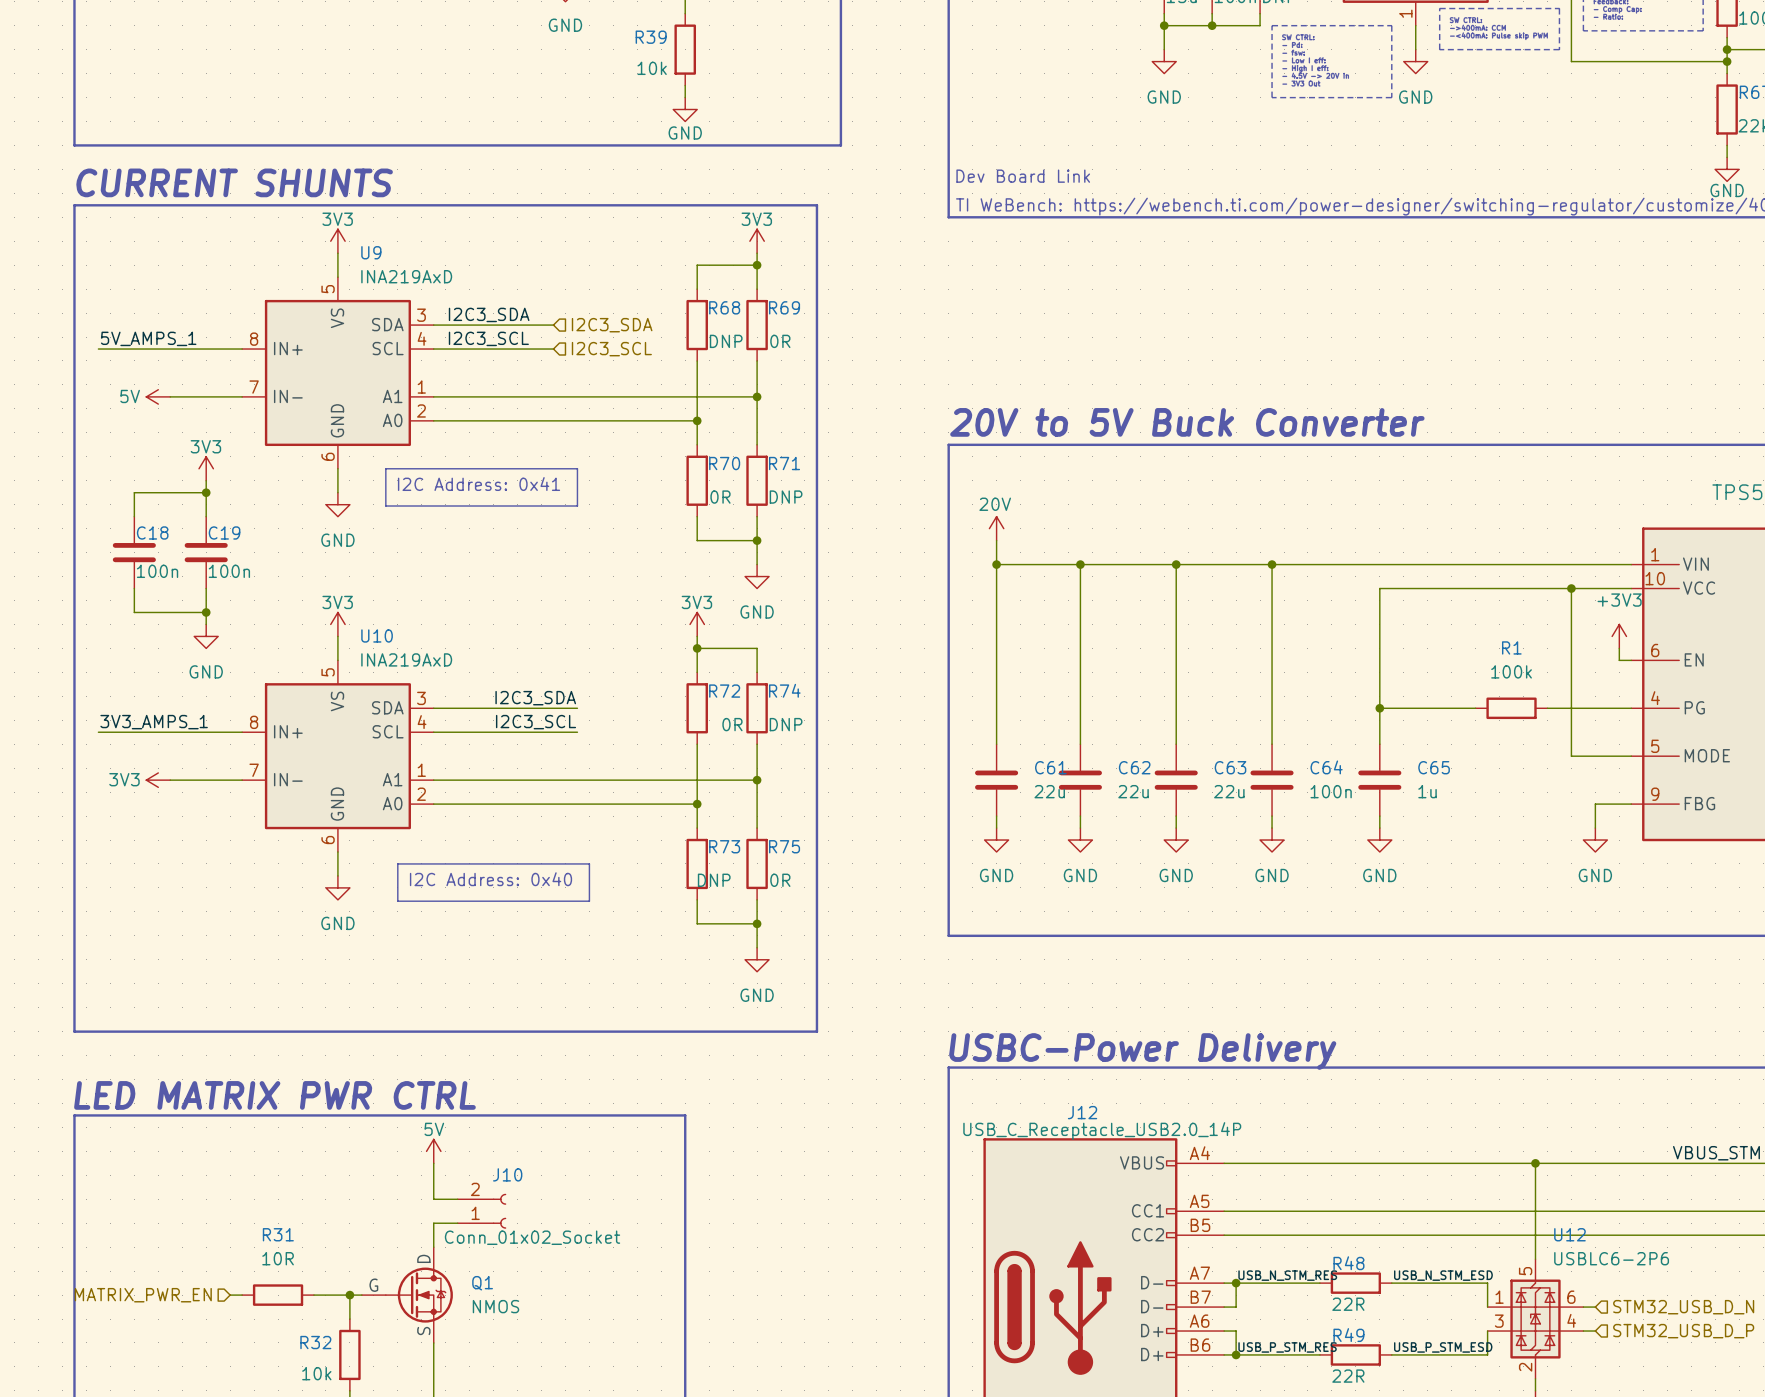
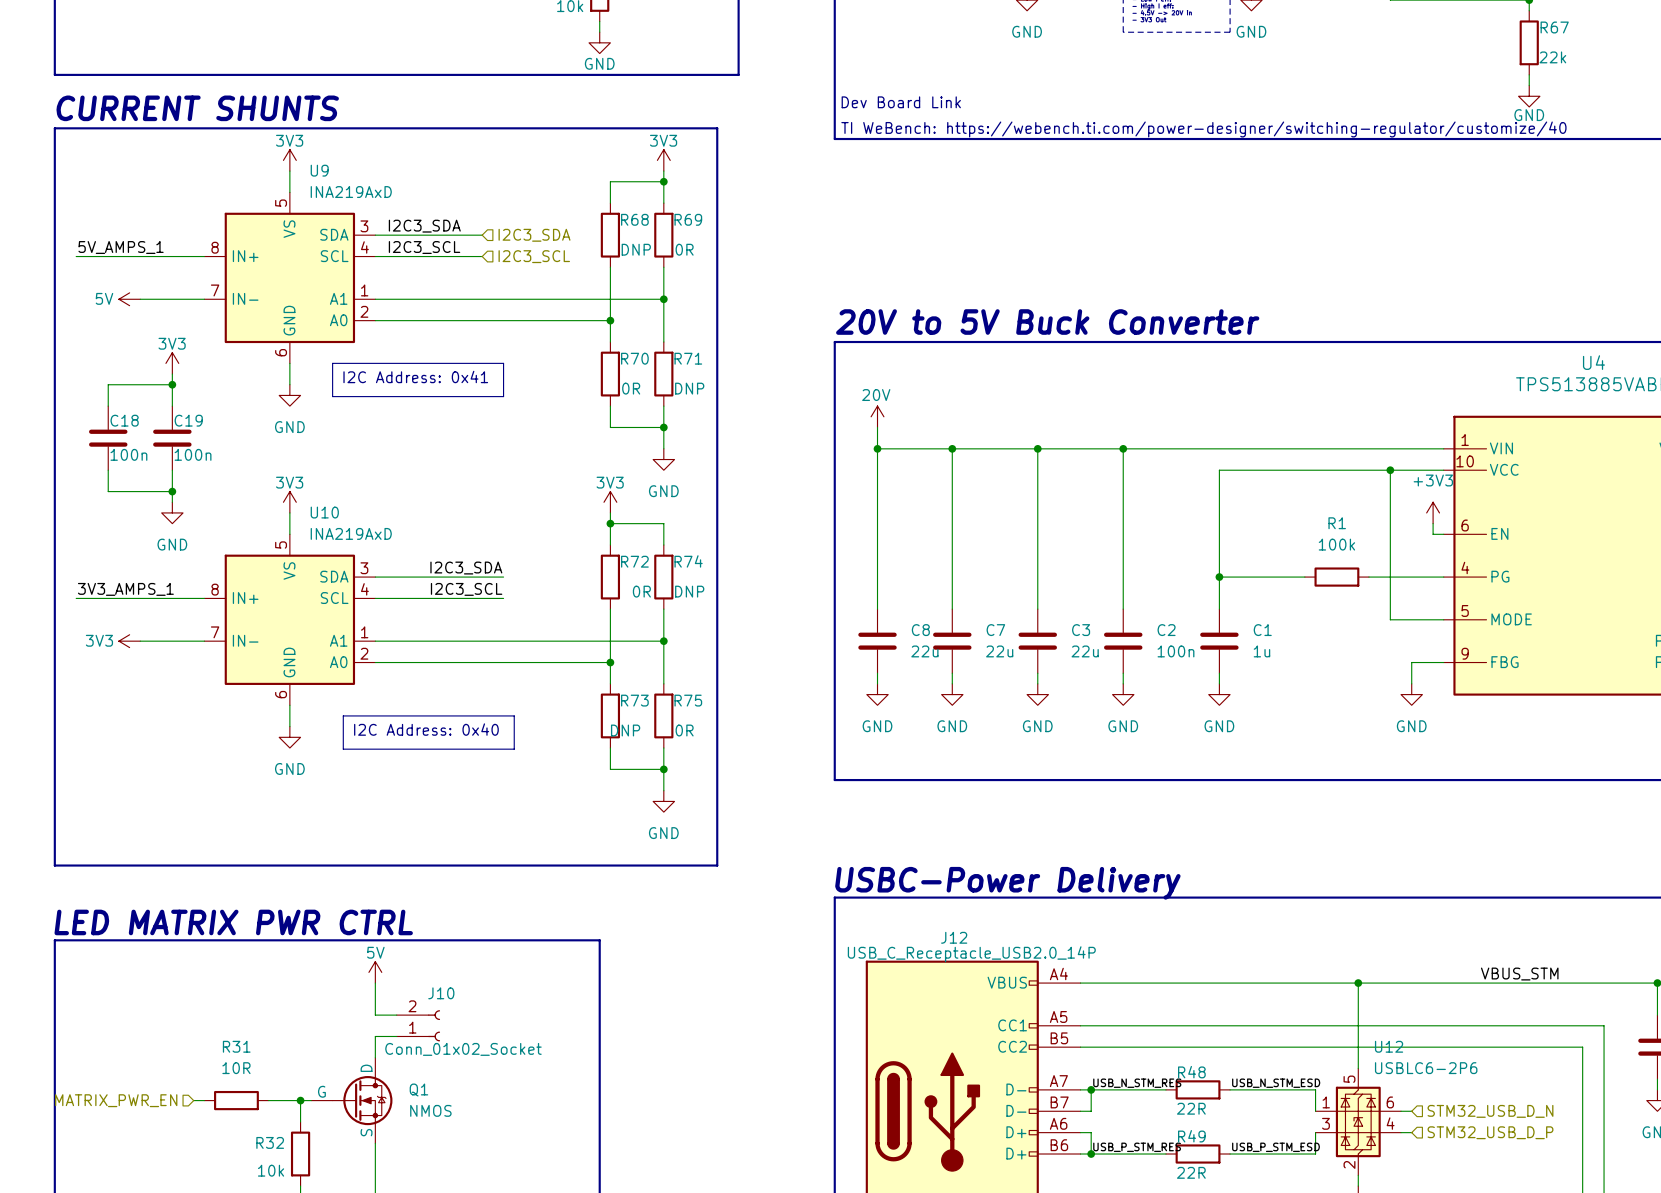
C61 name: C61 (1050, 767) -> C8 (920, 630)
C62 name: C62 (1134, 767) -> C7 (995, 630)
C63 name: C63 (1230, 767) -> C3 (1081, 630)
C64 name: C64 (1326, 767) -> C2 (1166, 630)
C65 name: C65 (1434, 767) -> C1 (1262, 630)

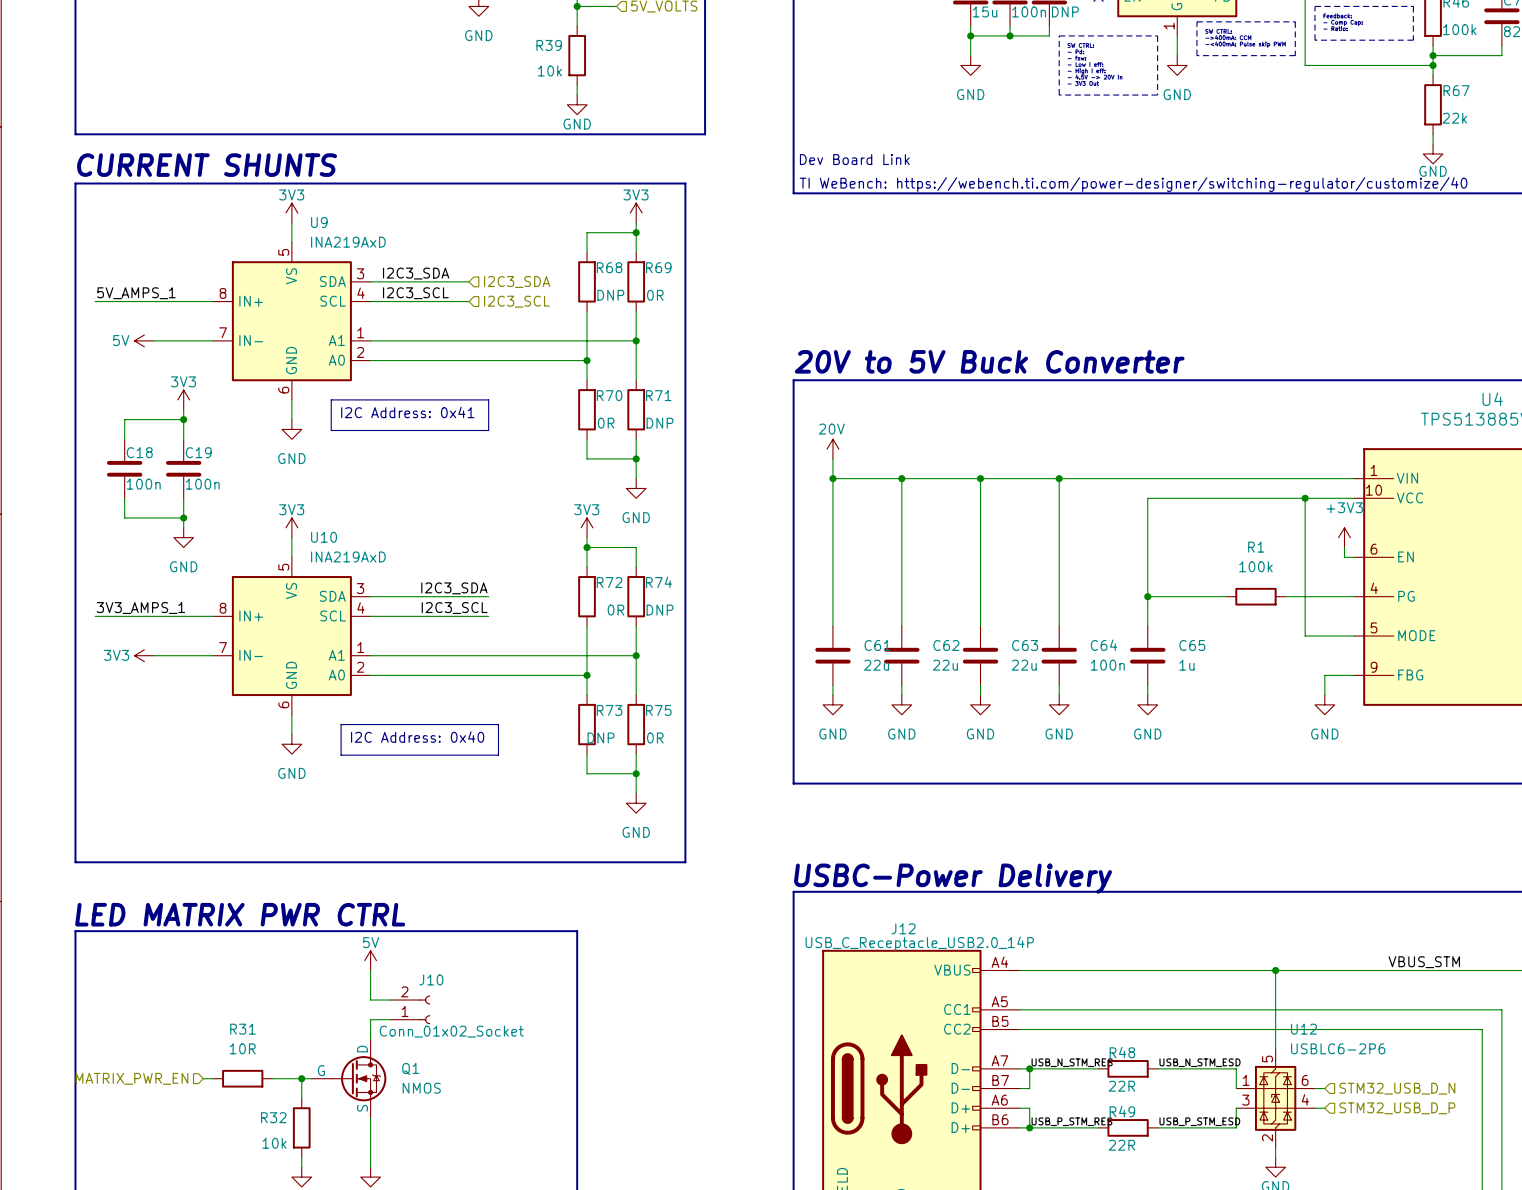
C8 name: C8 (920, 630) -> C61 (877, 645)
C7 name: C7 (995, 630) -> C62 (946, 645)
C3 name: C3 (1081, 630) -> C63 (1025, 645)
C2 name: C2 (1166, 630) -> C64 (1104, 645)
C1 name: C1 (1262, 630) -> C65 (1192, 645)

